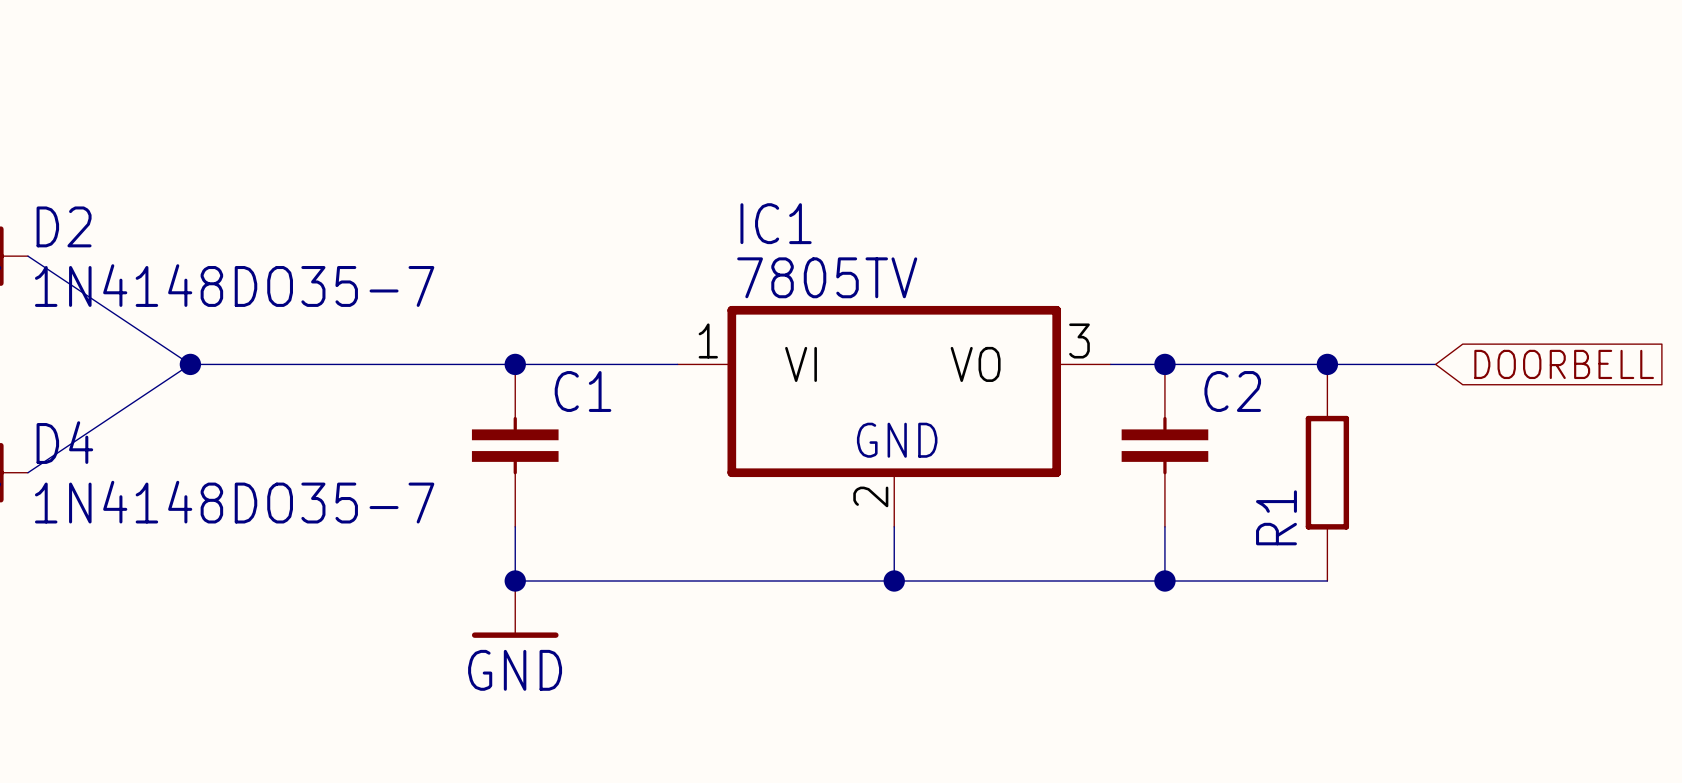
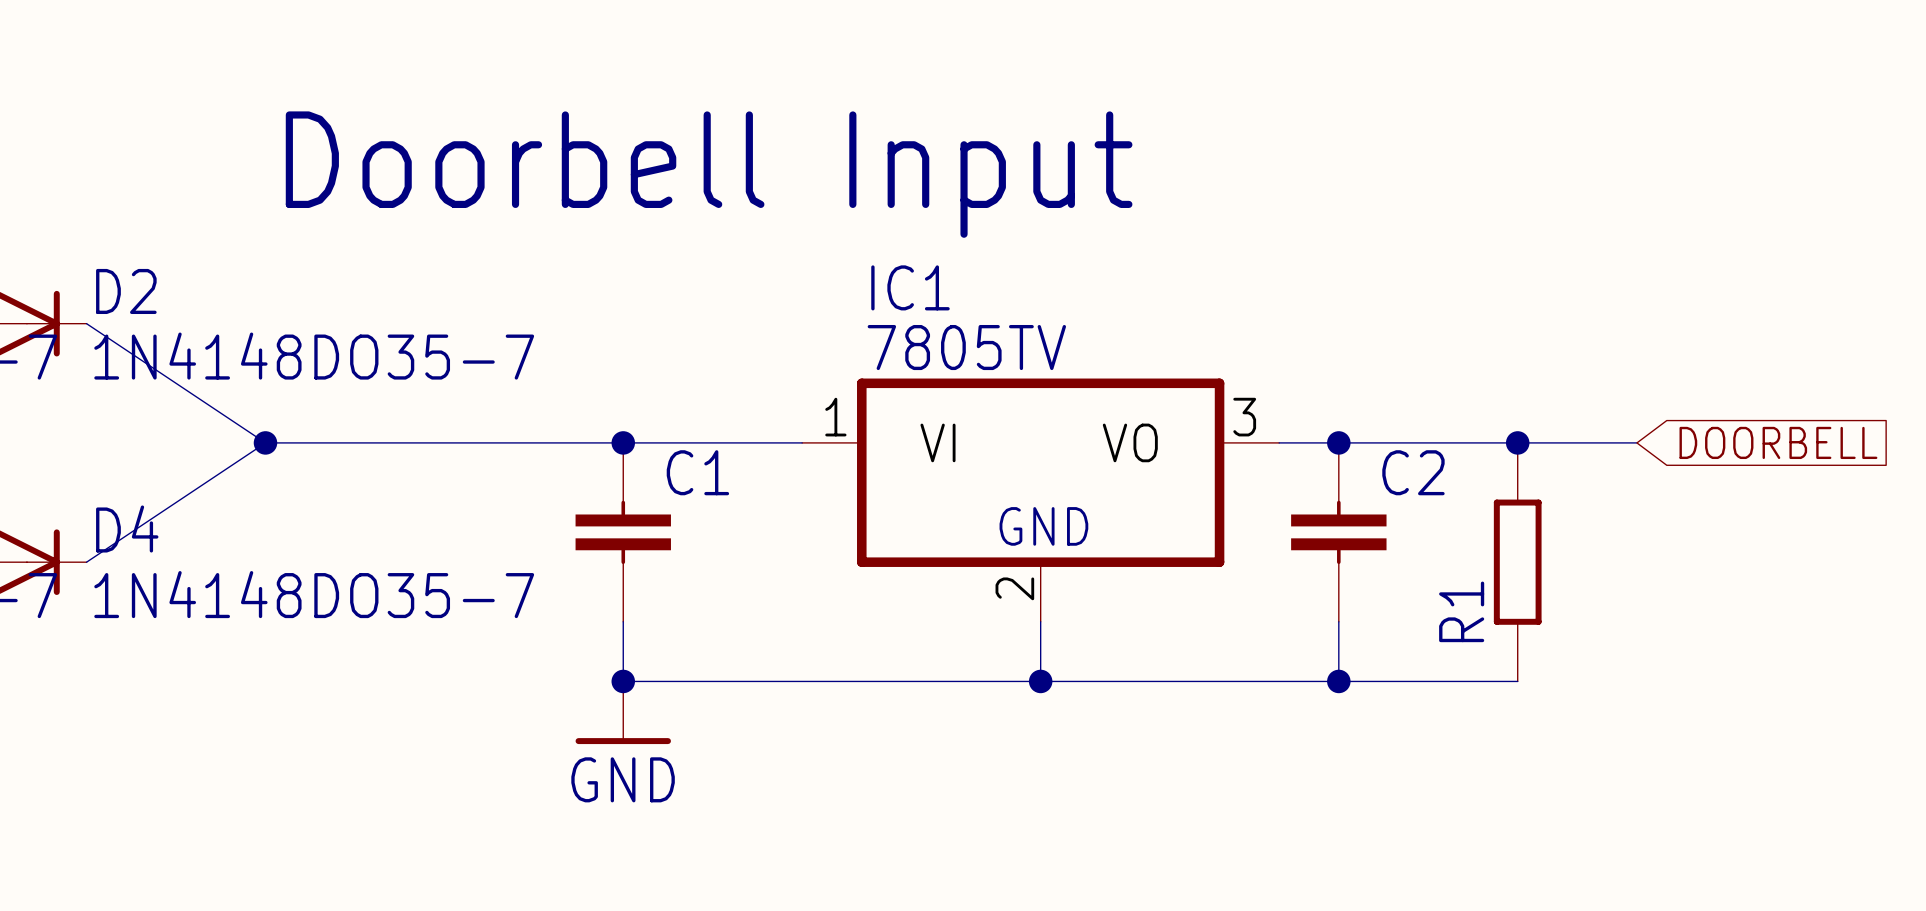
text: none -> Doorbell Input (709, 174)

